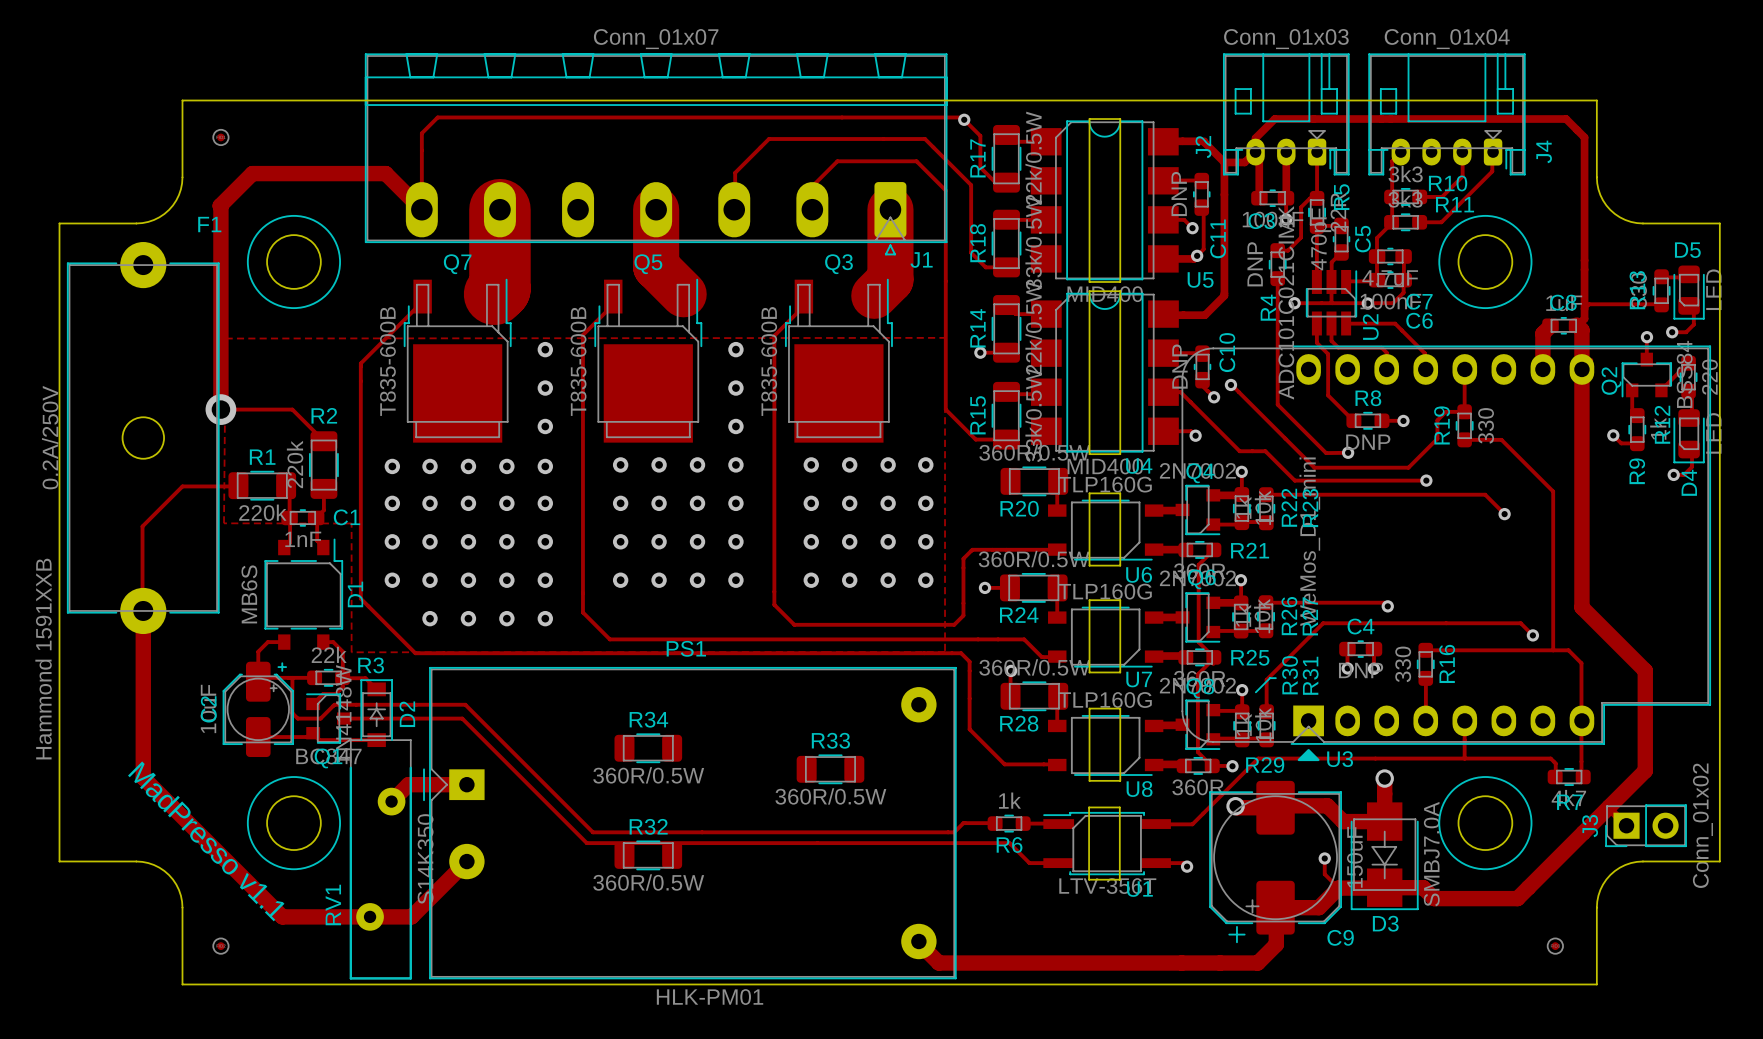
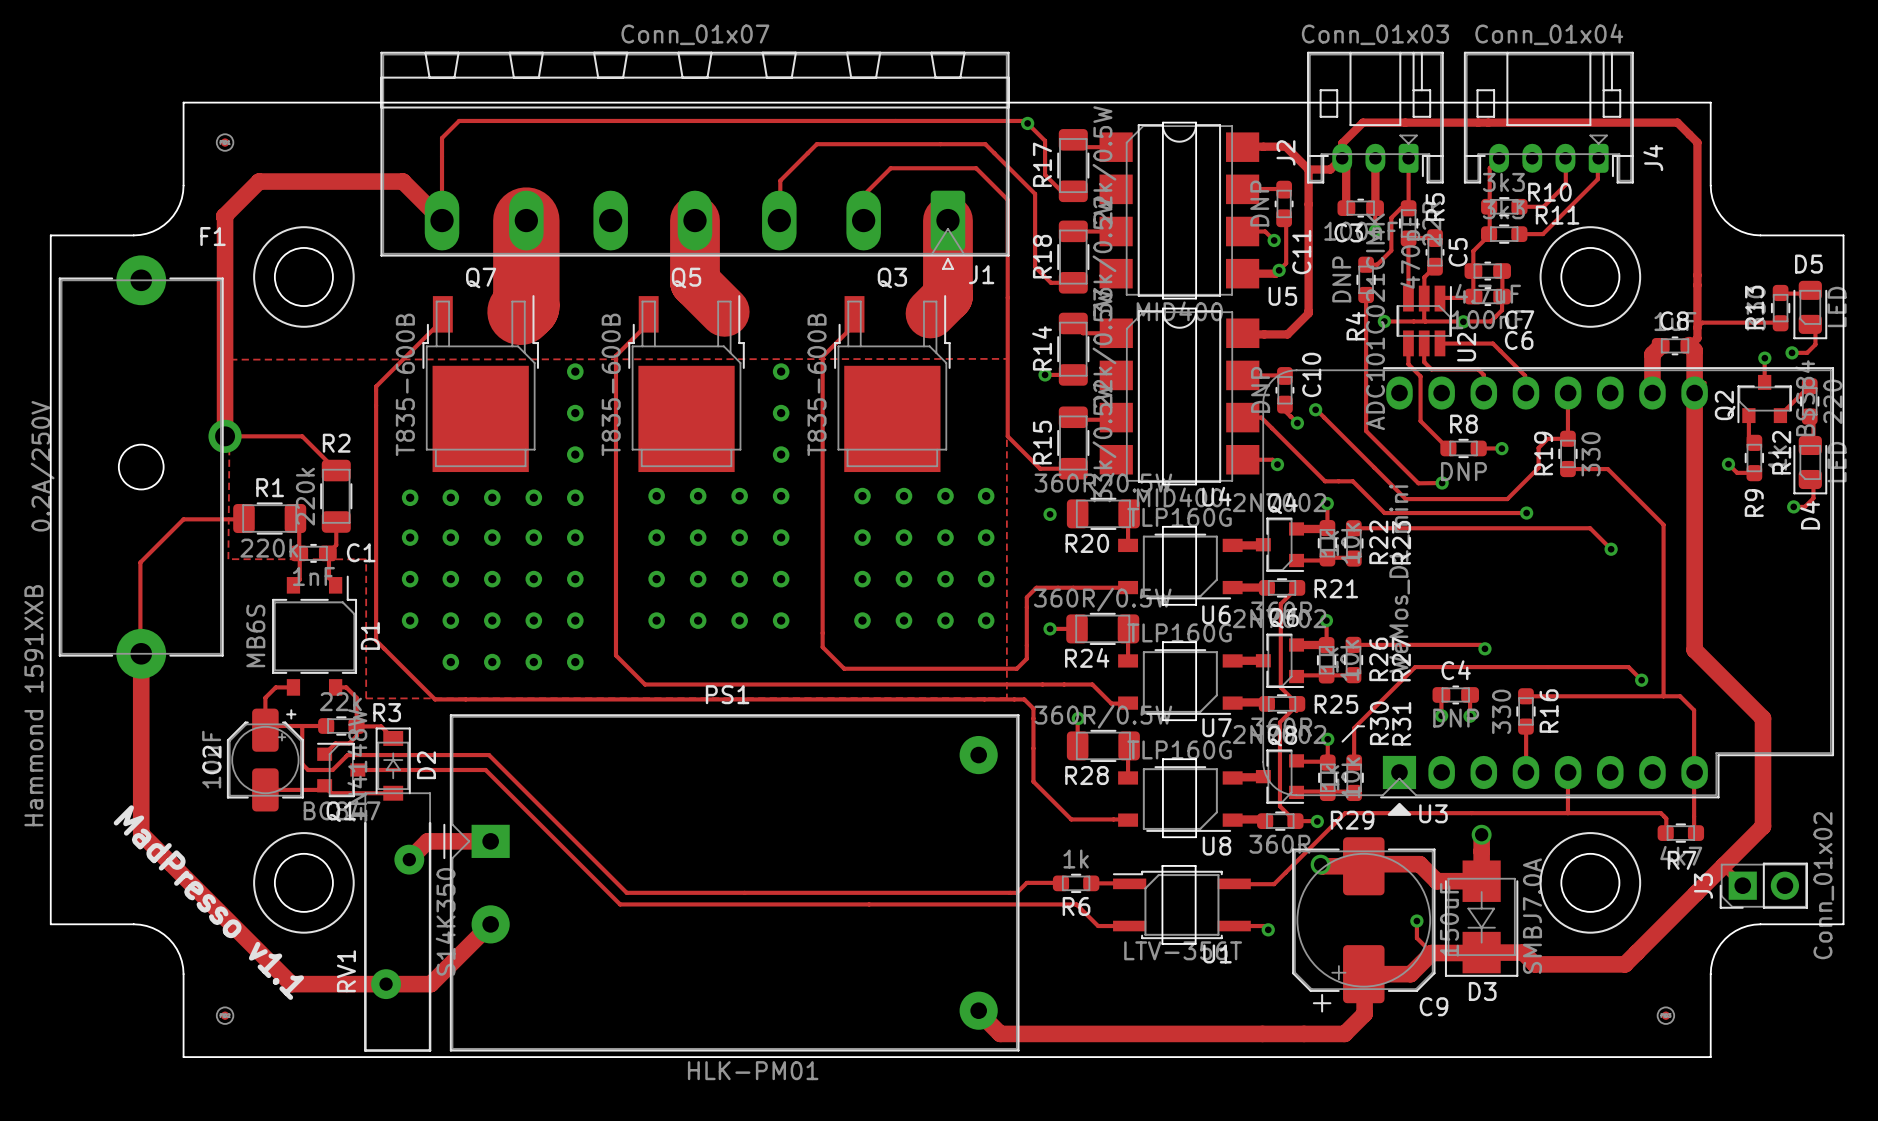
via: none -> (1050, 514)
R34: 360R/0.5W (648, 748) -> none
R33: 360R/0.5W (830, 769) -> none
R32: 360R/0.5W (648, 855) -> none

